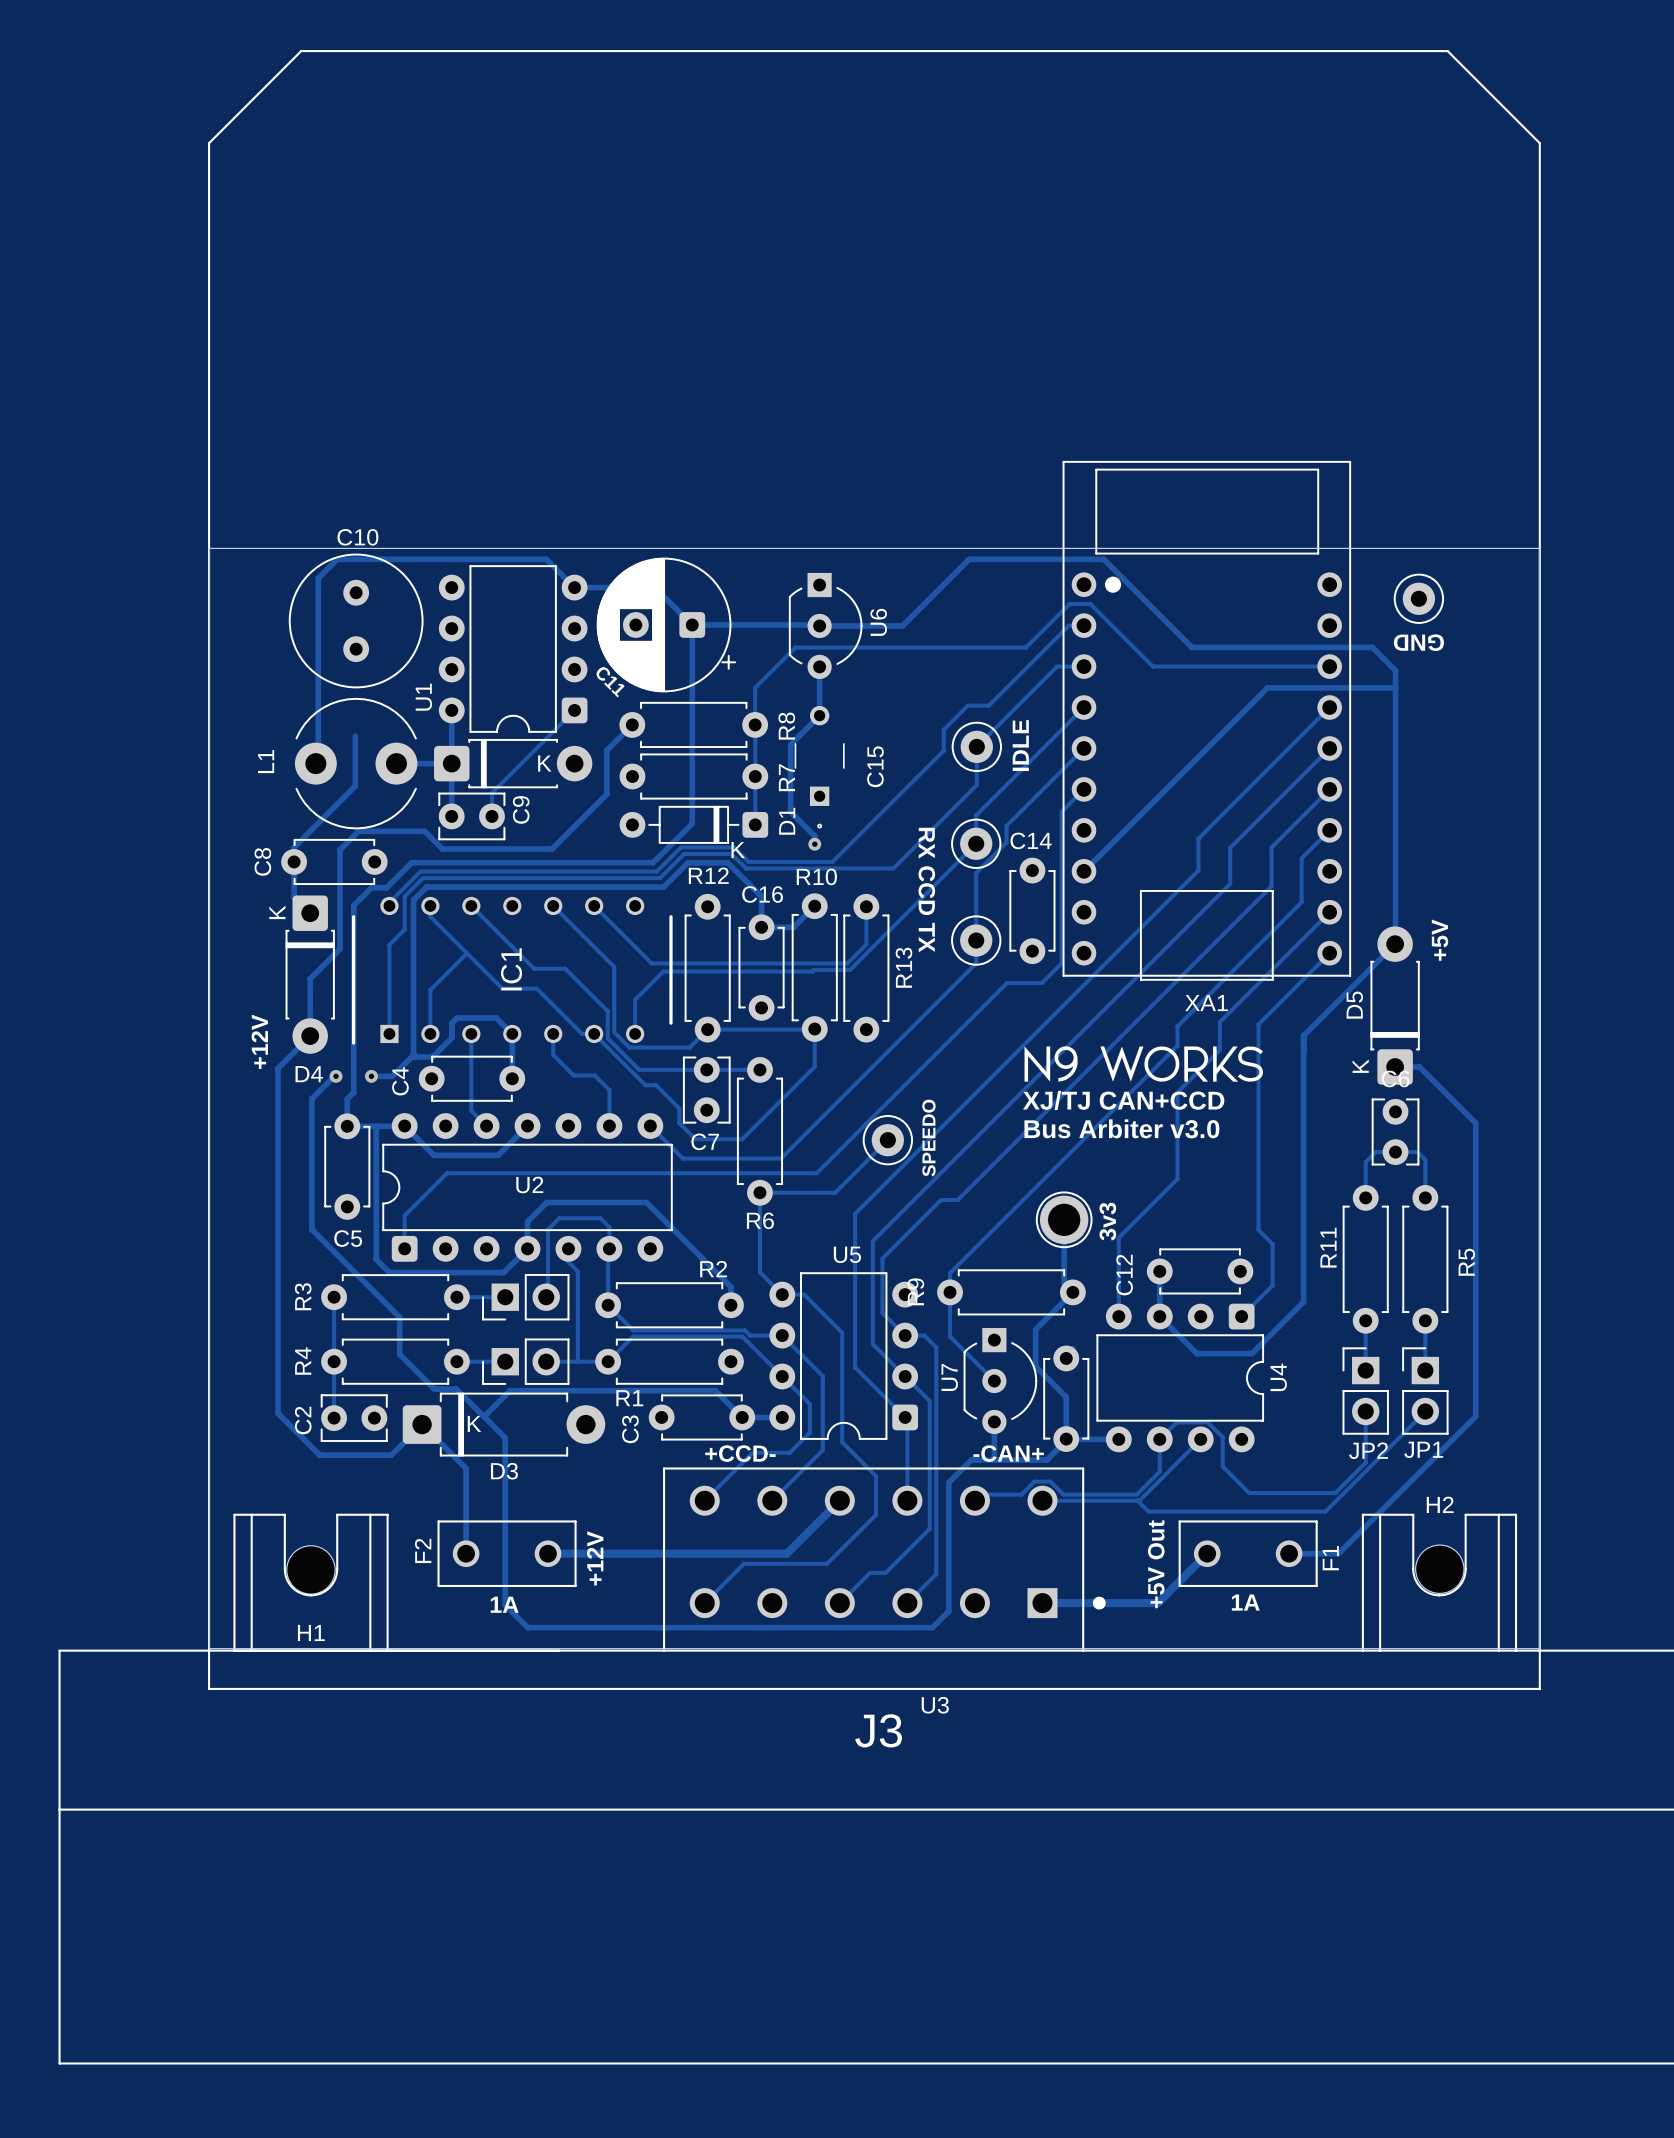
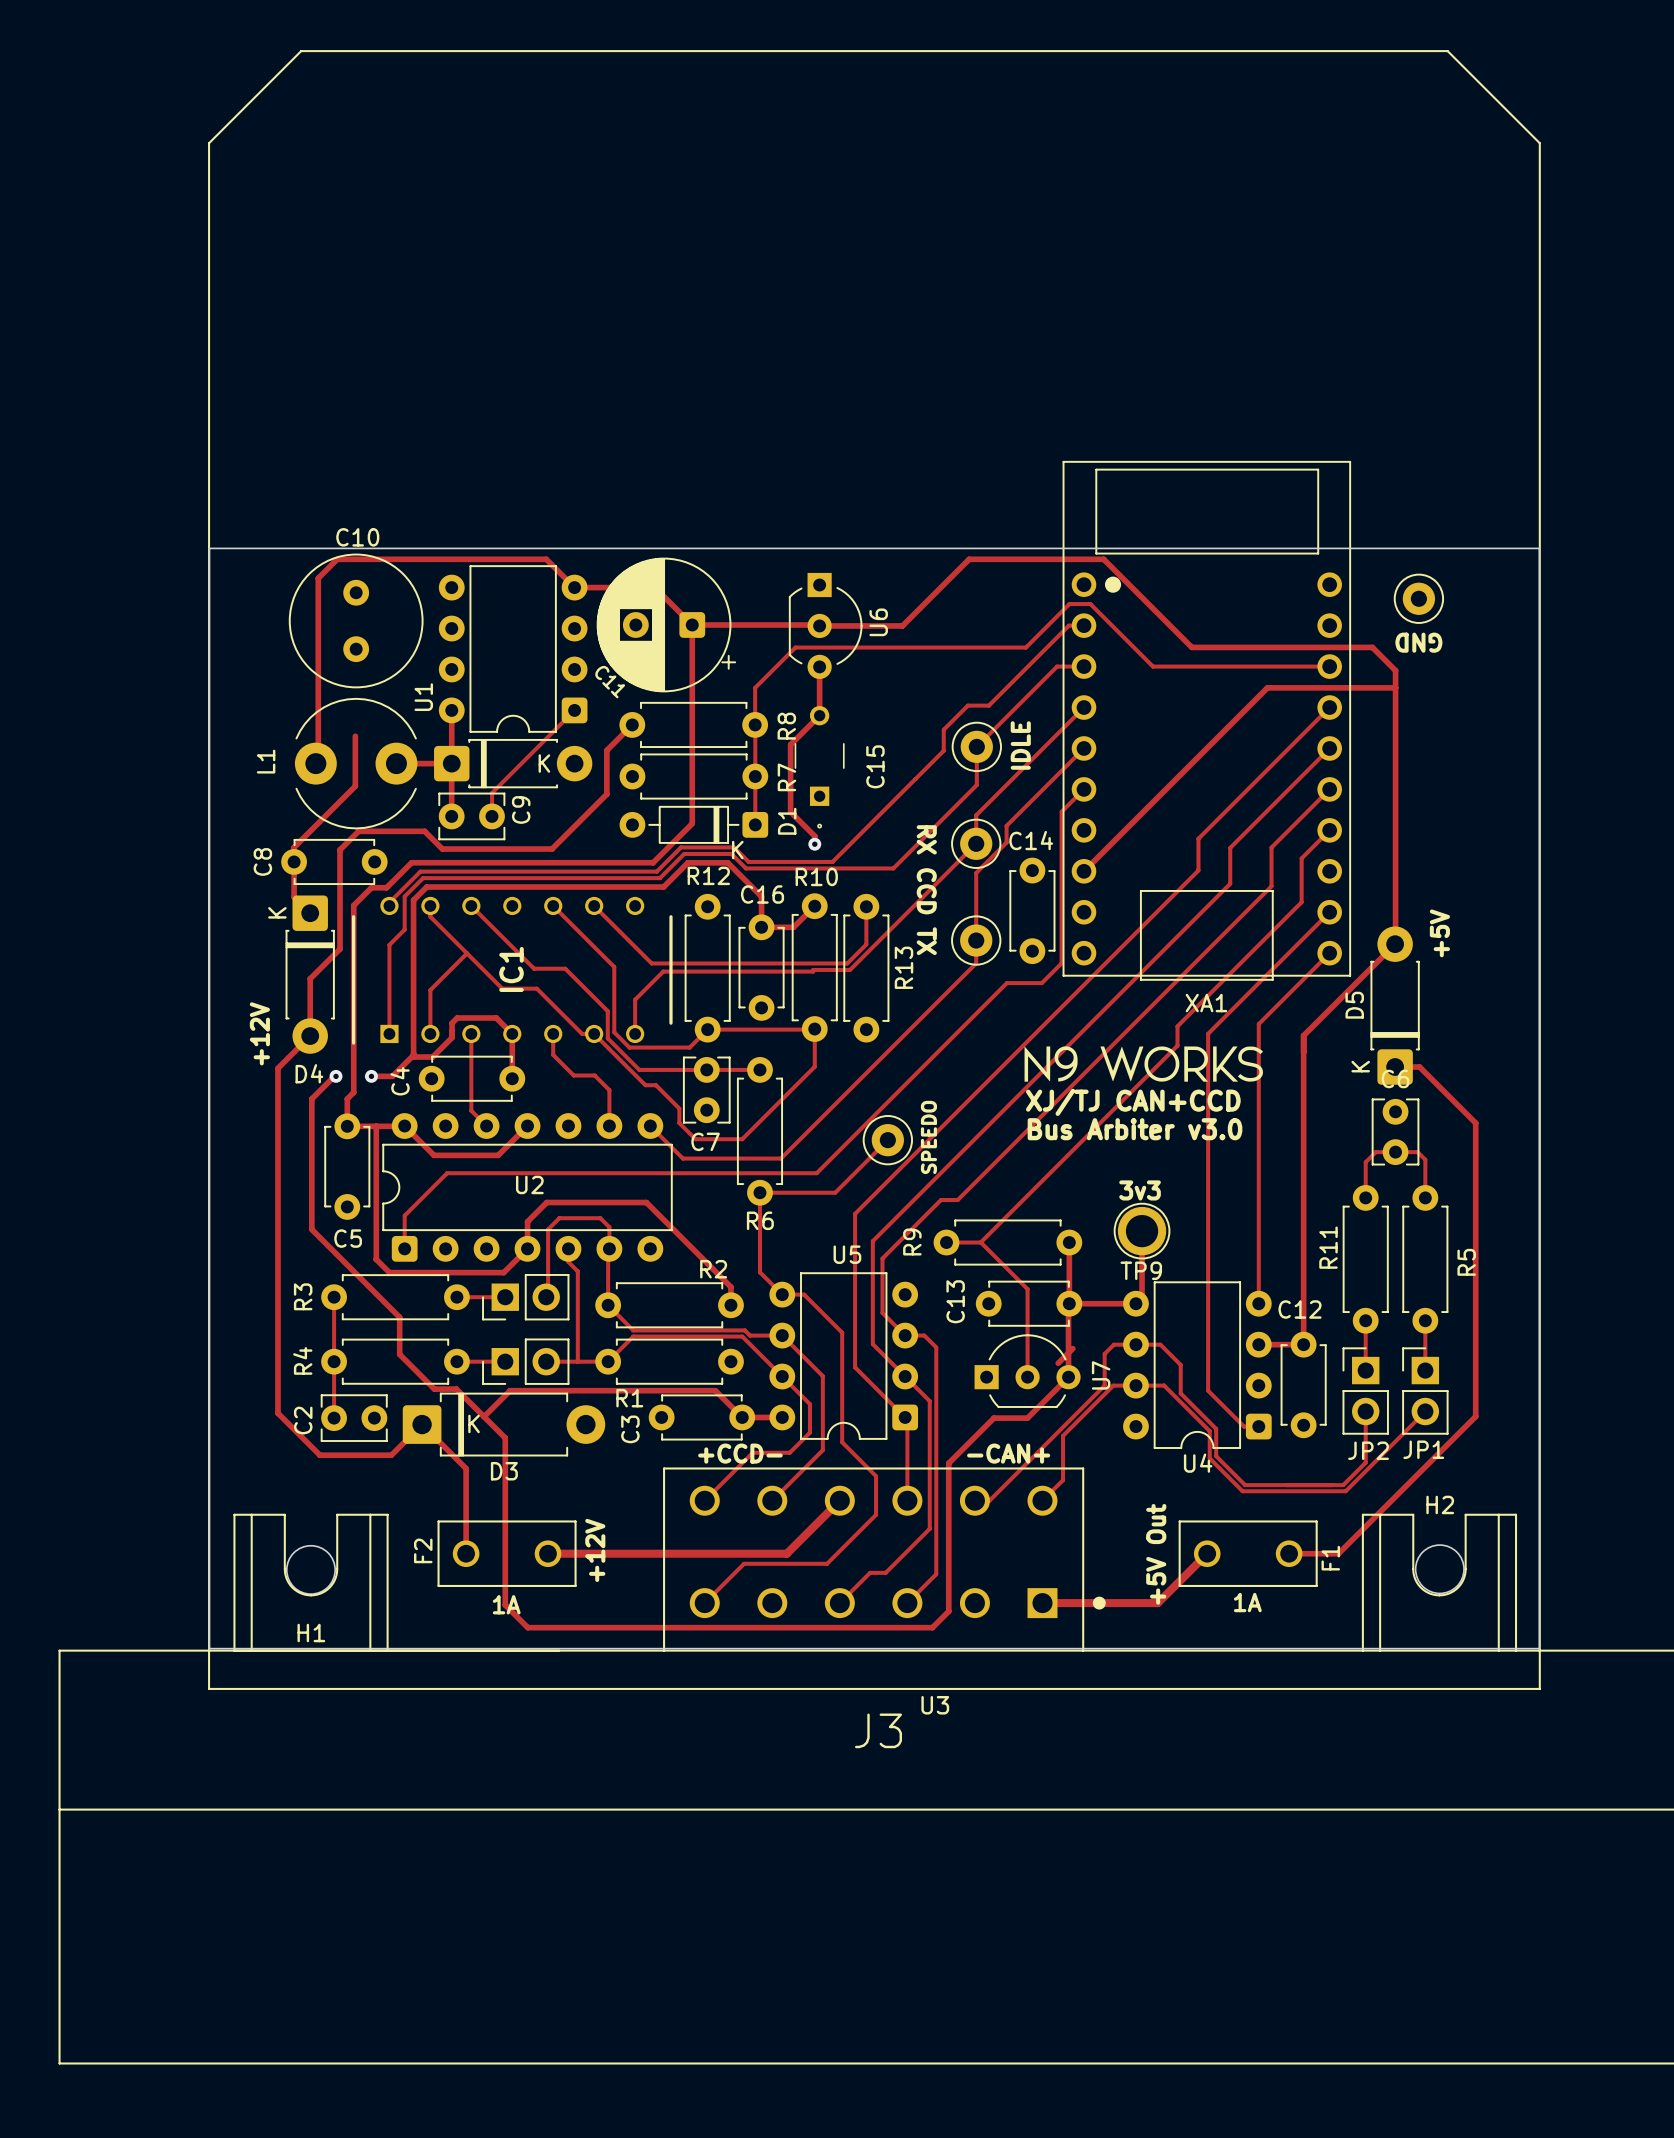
track: (1219, 1022) (1219, 1050) (1177, 1092) (1177, 1179) (1118, 1237) (1118, 1316) -> (1219, 1022) (1208, 1033) (1208, 1390) (1243, 1426) (1258, 1426)
track: (1258, 1024) (1258, 1229) (1272, 1244) (1272, 1285) (1241, 1316) -> (1258, 1024) (1258, 1303)
track: (1064, 1219) (1064, 1283) (1072, 1292) (1035, 1329) (1035, 1366) (1066, 1397) (1066, 1439) -> none
part: (1064, 1219) -> none
text rotation: 0° (1107, 1221) -> 90° clockwise (1140, 1190)
track: none -> (1142, 1231) (1142, 1297)
TP9: none -> (1142, 1231)
track: none -> (946, 1242) (980, 1242) (1027, 1289) (1027, 1377)
track: (980, 1242) (950, 1273) (950, 1336) (994, 1381) -> none
track: none -> (1069, 1242) (1069, 1303) (1135, 1303)
track: (1159, 1271) (1159, 1316) (1196, 1353) (1252, 1353) (1303, 1302) -> (1258, 1344) (1303, 1344) (1303, 1302)
C12 rotation: 0° (1200, 1271) -> 90° clockwise (1303, 1384)
C12 position: (1200, 1271) -> (1303, 1384)
R9 position: (1011, 1292) -> (1007, 1242)
C13: none -> (1029, 1303)
U7 name position: U7 (949, 1377) -> U7 (1101, 1375)
U4 rotation: 0° (1180, 1377) -> 90° clockwise (1197, 1365)
U7 rotation: 0° (1000, 1381) -> 90° counterclockwise (1027, 1371)
part: (1066, 1398) -> none
track: (994, 1421) (993, 1460) -> none
track: (1074, 1432) (1046, 1460) (971, 1460) (948, 1482) -> (1068, 1304) (1068, 1377) (1027, 1418) (993, 1418) (948, 1463) (948, 1482)
track: (1081, 1439) (1118, 1439) -> none
track: (1200, 1439) (1139, 1500) (1042, 1500) -> (1164, 1385) (1113, 1385) (1063, 1435) (1063, 1480) (1042, 1500)
track: (1343, 1485) (1335, 1493) (1249, 1493) (1222, 1466) (1222, 1437) (1207, 1422) (1176, 1422) (1159, 1439) (1159, 1471) (1136, 1494) (1063, 1494) (1050, 1481) (1034, 1481) (1021, 1494) (981, 1494) -> (1343, 1485) (1245, 1485) (1216, 1456) (1216, 1428) (1180, 1393) (1180, 1364) (1160, 1344) (1113, 1344) (1104, 1353) (1104, 1385) (989, 1500) (974, 1500)
track: (1345, 1491) (1325, 1511) (1148, 1511) (1137, 1500) -> (1345, 1491) (1242, 1491) (1209, 1458) (1209, 1431) (1164, 1385)

